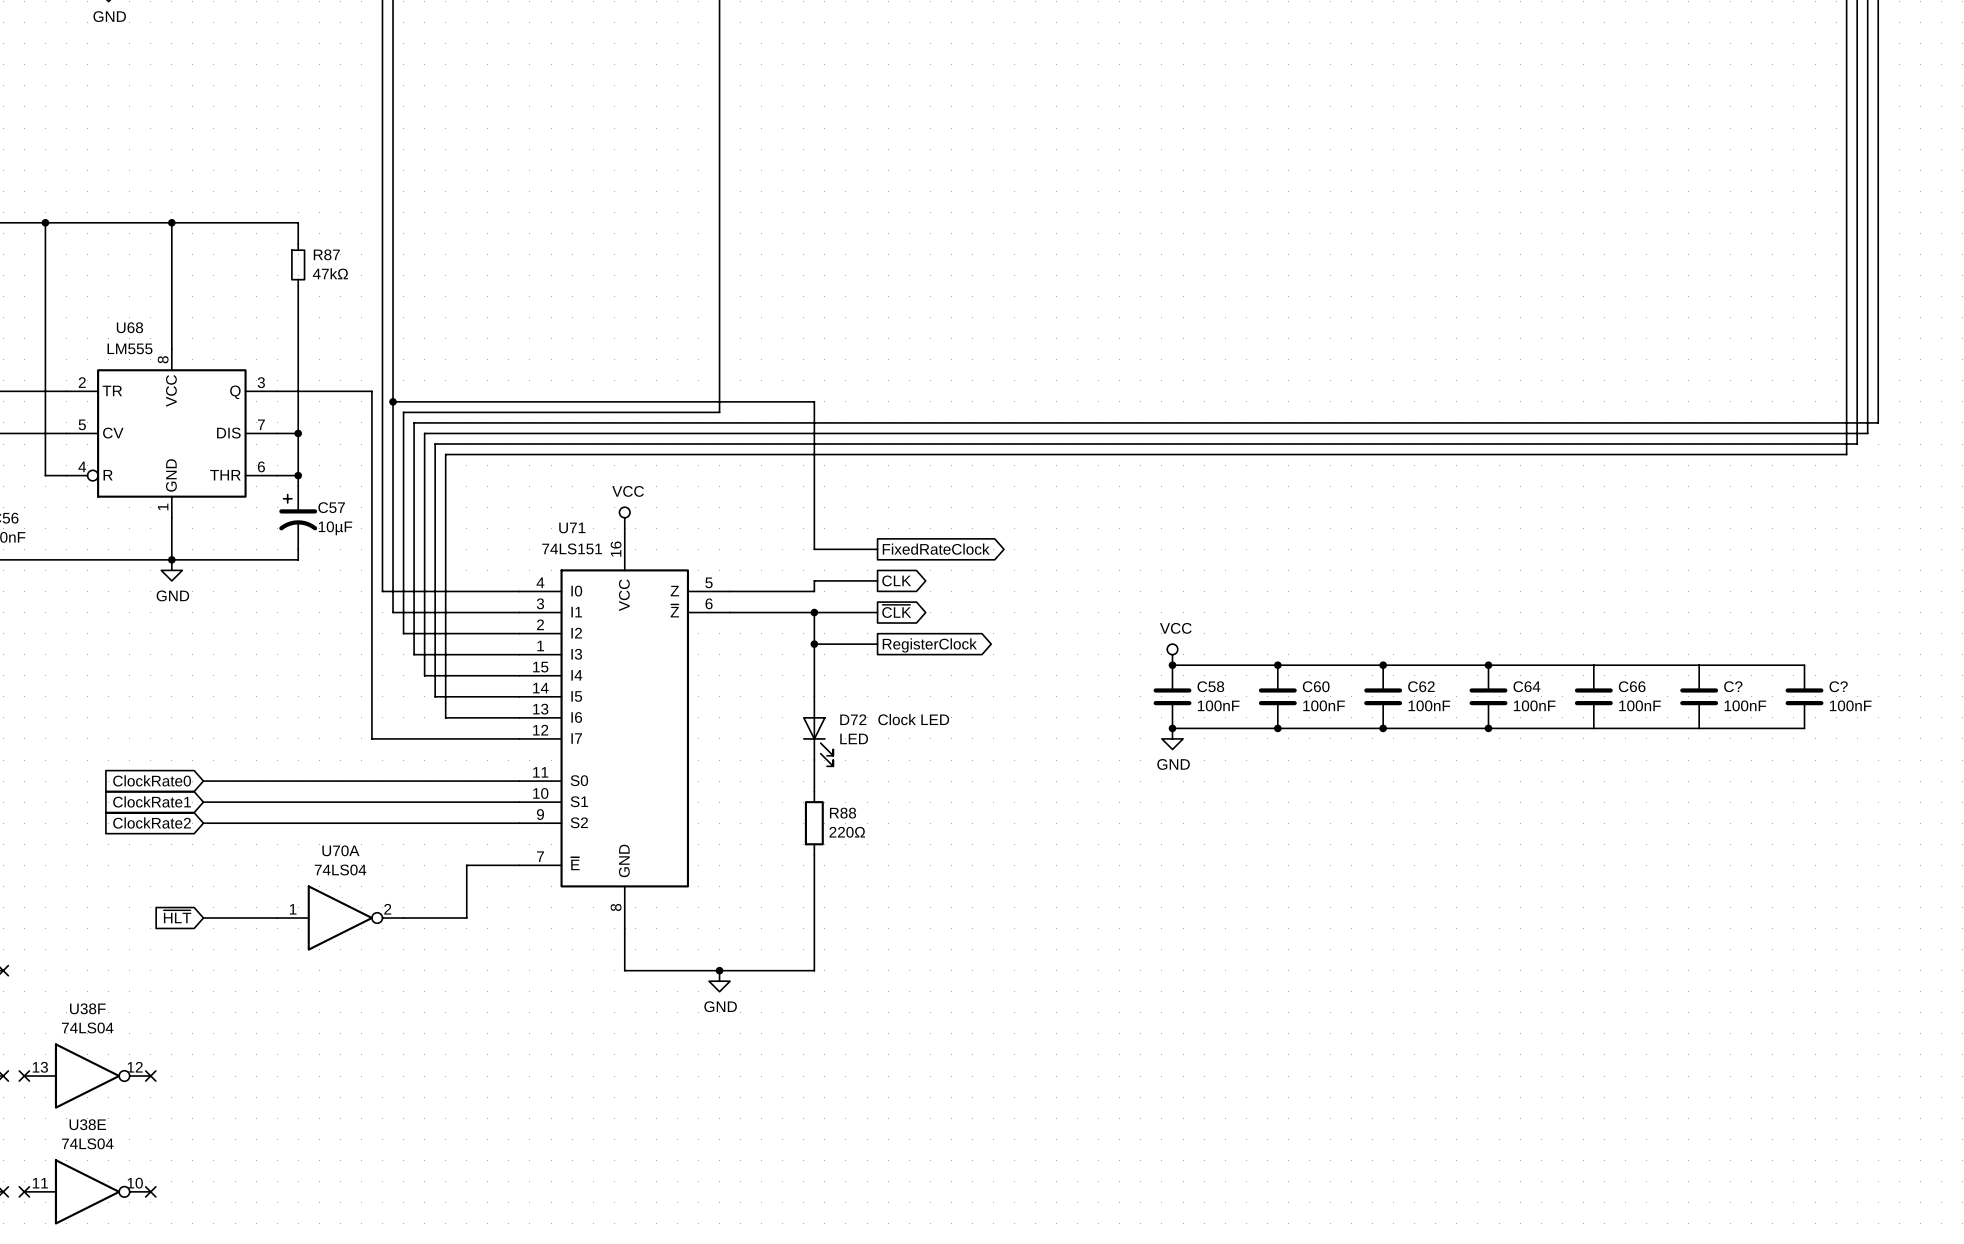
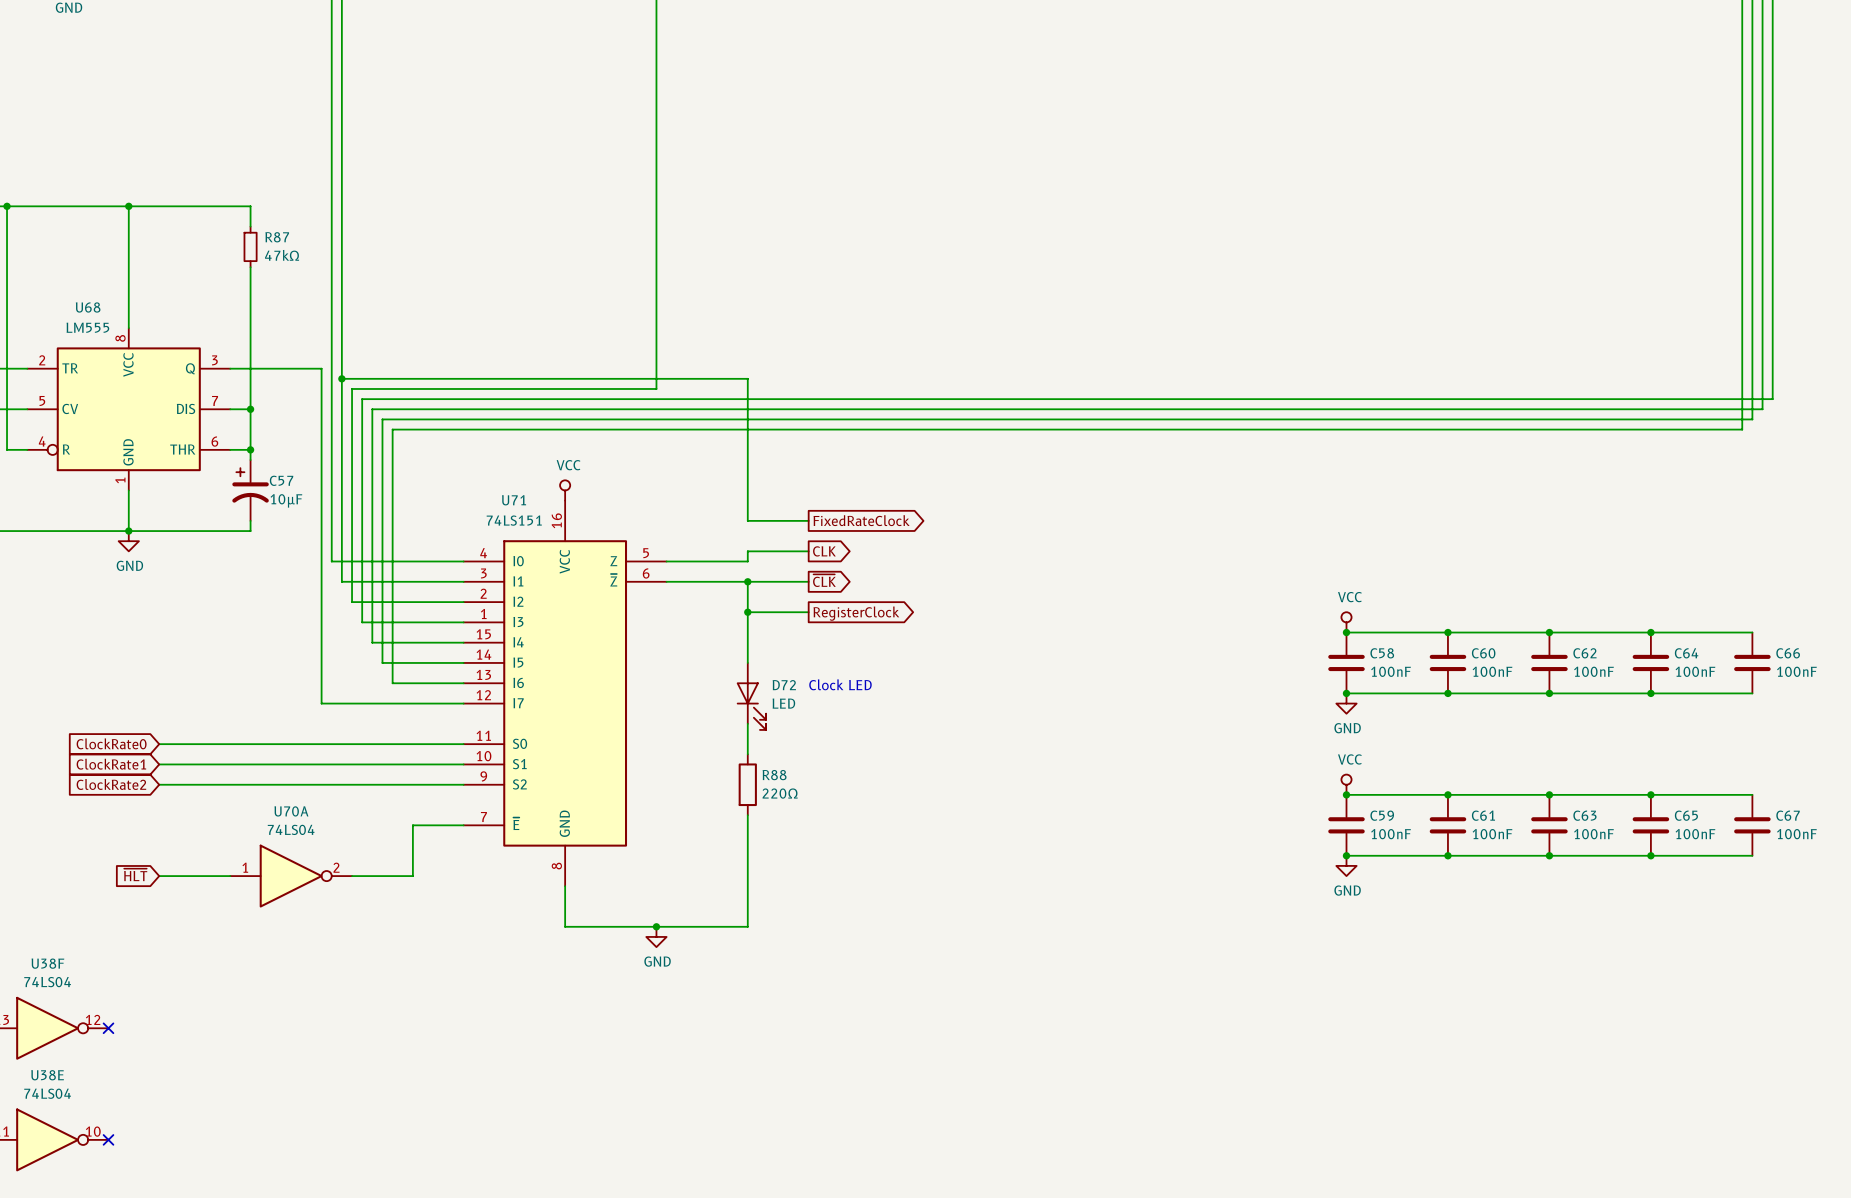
power symbol: VCC (1172, 654) -> none
power symbol: none -> VCC (1346, 622)
wire: (1172, 665) (1435, 665) -> none
junction: (1172, 665) -> none
junction: (1277, 665) -> none
junction: (1383, 665) -> none
junction: none -> (1346, 632)
junction: (1488, 665) -> none
junction: none -> (1447, 632)
junction: none -> (1549, 632)
junction: none -> (1650, 632)
wire: none -> (1701, 632) (1752, 632)
C58 position: (1172, 696) -> (1346, 662)
C60 position: (1277, 696) -> (1447, 662)
C62 position: (1383, 696) -> (1549, 662)
C64 position: (1488, 696) -> (1650, 662)
C66 position: (1593, 696) -> (1752, 662)
C?: 100nF (1699, 696) -> none
C?: 100nF (1804, 696) -> none
wire: (1172, 728) (1435, 728) -> none
junction: (1172, 728) -> none
junction: (1277, 728) -> none
junction: (1383, 728) -> none
junction: none -> (1346, 693)
junction: (1488, 728) -> none
junction: none -> (1447, 693)
junction: none -> (1549, 693)
junction: none -> (1650, 693)
wire: none -> (1701, 693) (1752, 693)
power symbol: GND (1172, 738) -> none
power symbol: none -> GND (1346, 703)
power symbol: none -> VCC (1346, 784)
wire: none -> (1346, 794) (1752, 794)
junction: none -> (1346, 794)
junction: none -> (1447, 794)
junction: none -> (1549, 794)
junction: none -> (1650, 794)
C59: none -> 100nF (1346, 825)
C61: none -> 100nF (1447, 825)
C63: none -> 100nF (1549, 825)
C65: none -> 100nF (1650, 825)
C67: none -> 100nF (1752, 825)
wire: none -> (1346, 855) (1752, 855)
junction: none -> (1346, 855)
junction: none -> (1447, 855)
junction: none -> (1549, 855)
junction: none -> (1650, 855)
power symbol: none -> GND (1346, 865)

